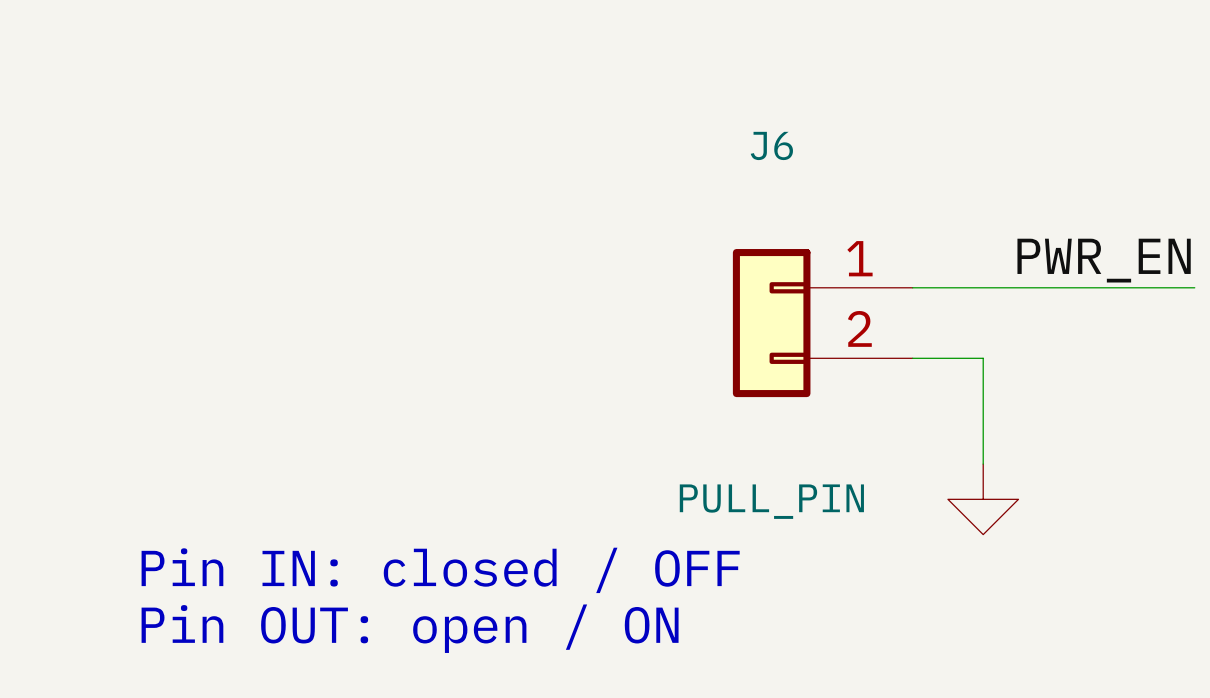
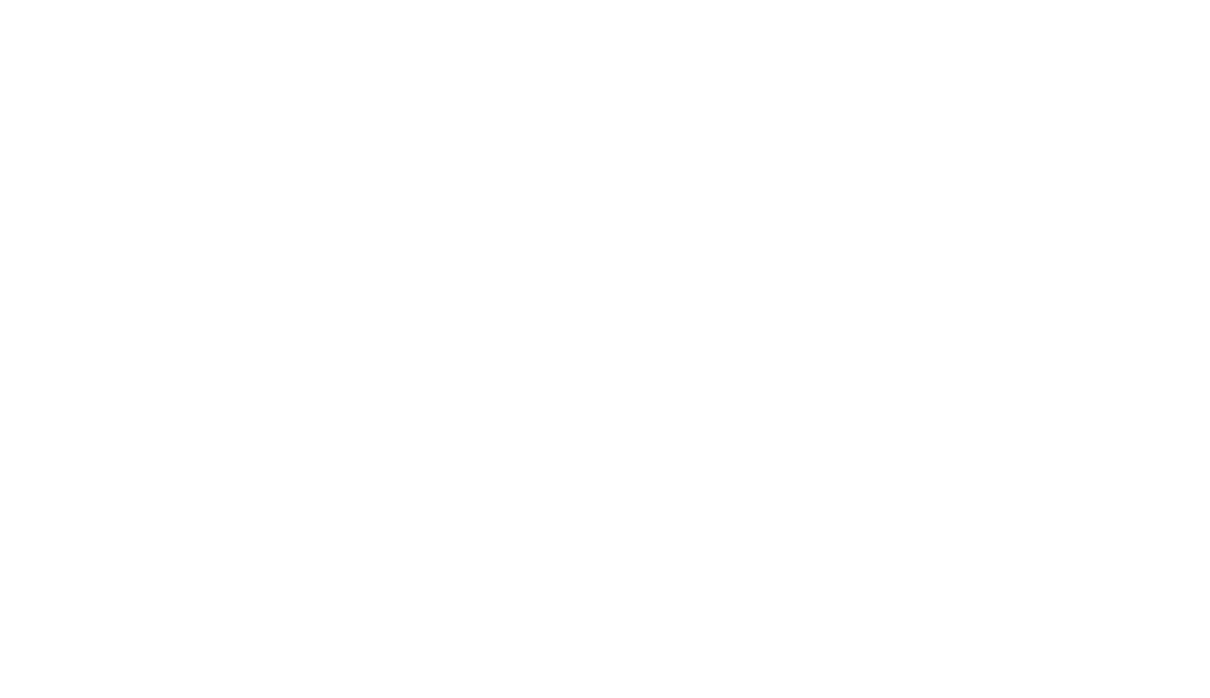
label: PWR_EN (1104, 260) -> none
wire: (912, 287) (1194, 287) -> none
J6: PULL_PIN (822, 323) -> none
wire: (912, 358) (983, 358) (983, 464) -> none
power symbol: (983, 499) -> none
text: Pin IN: closed / OFF (440, 570) -> none
text: Pin OUT: open / ON (410, 628) -> none

